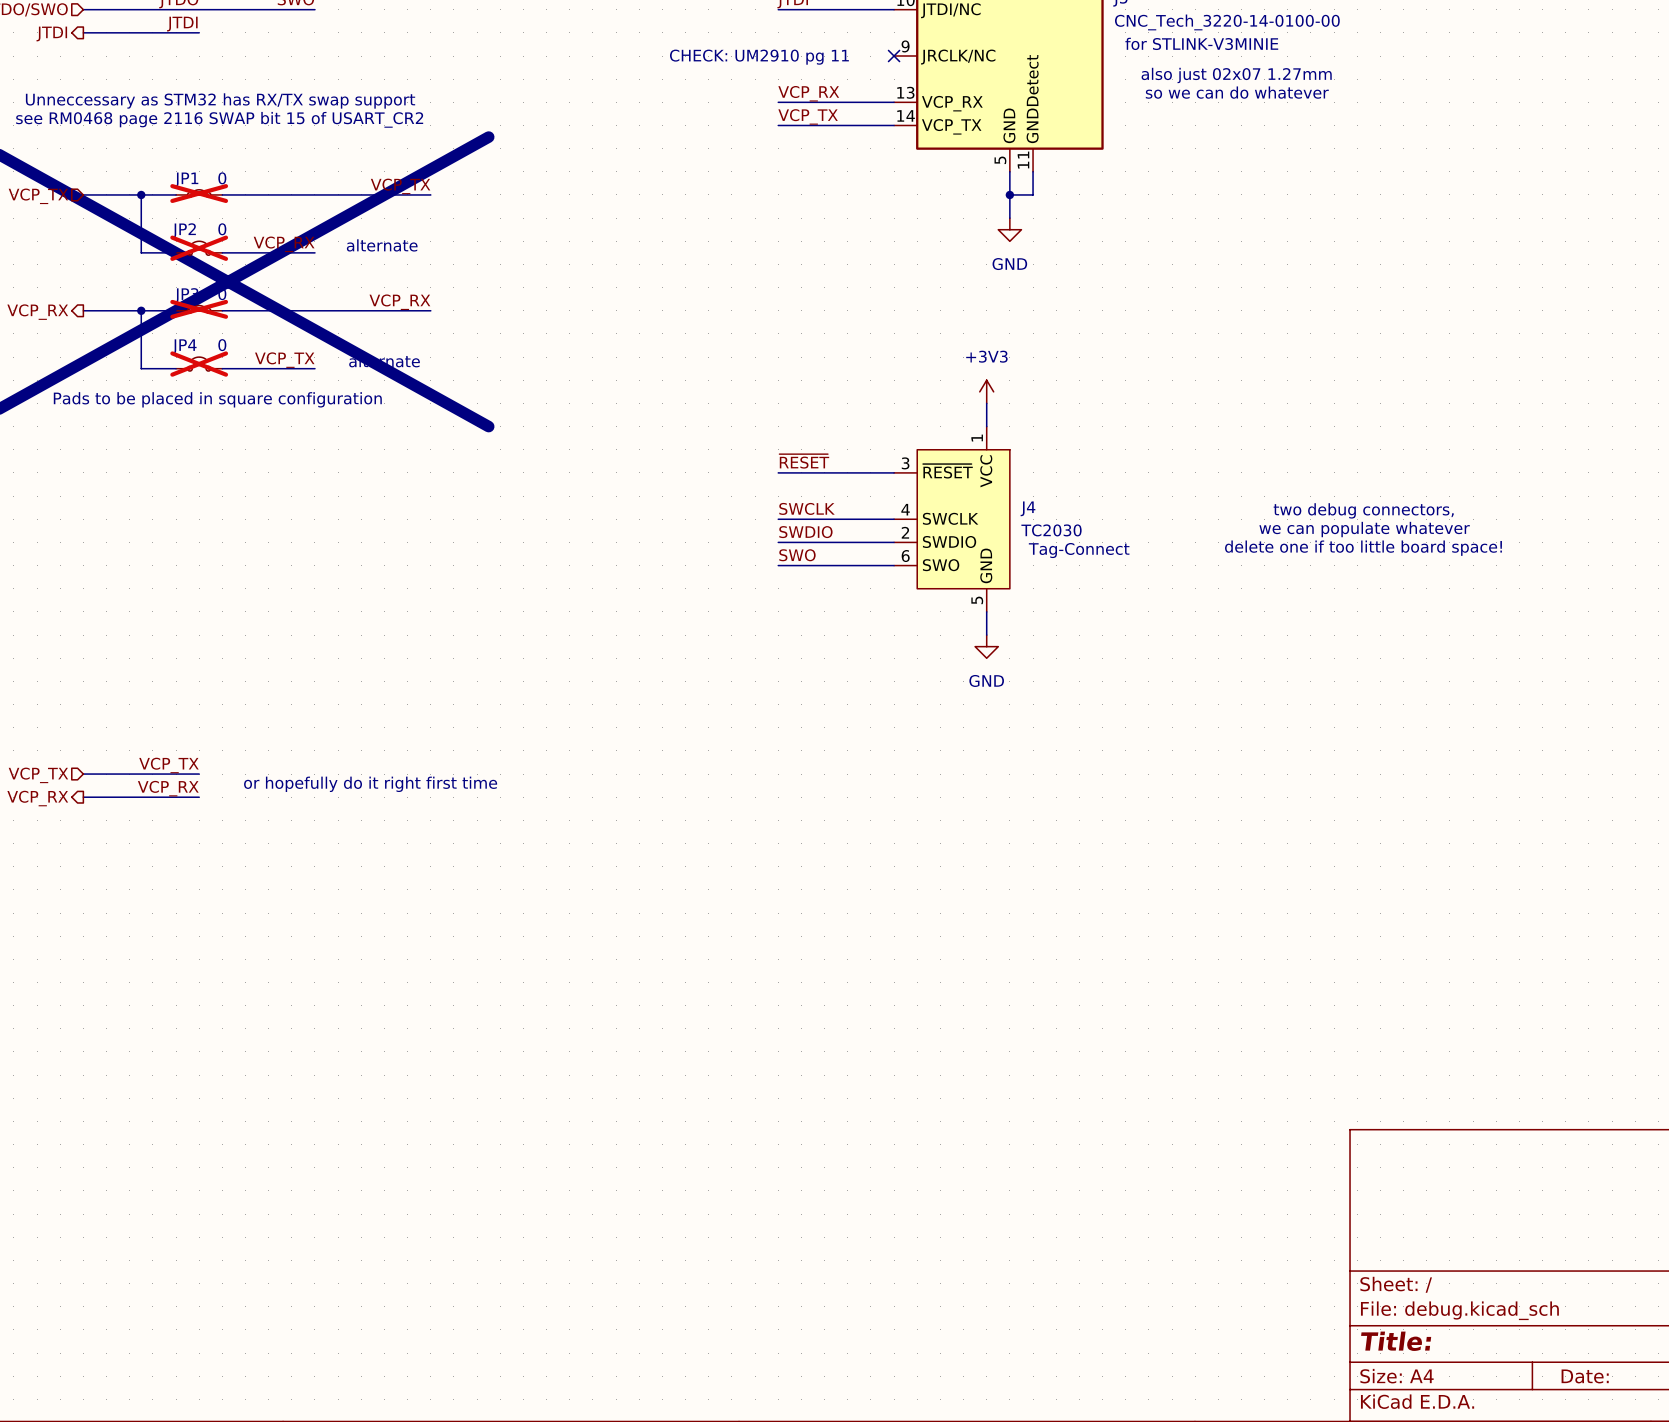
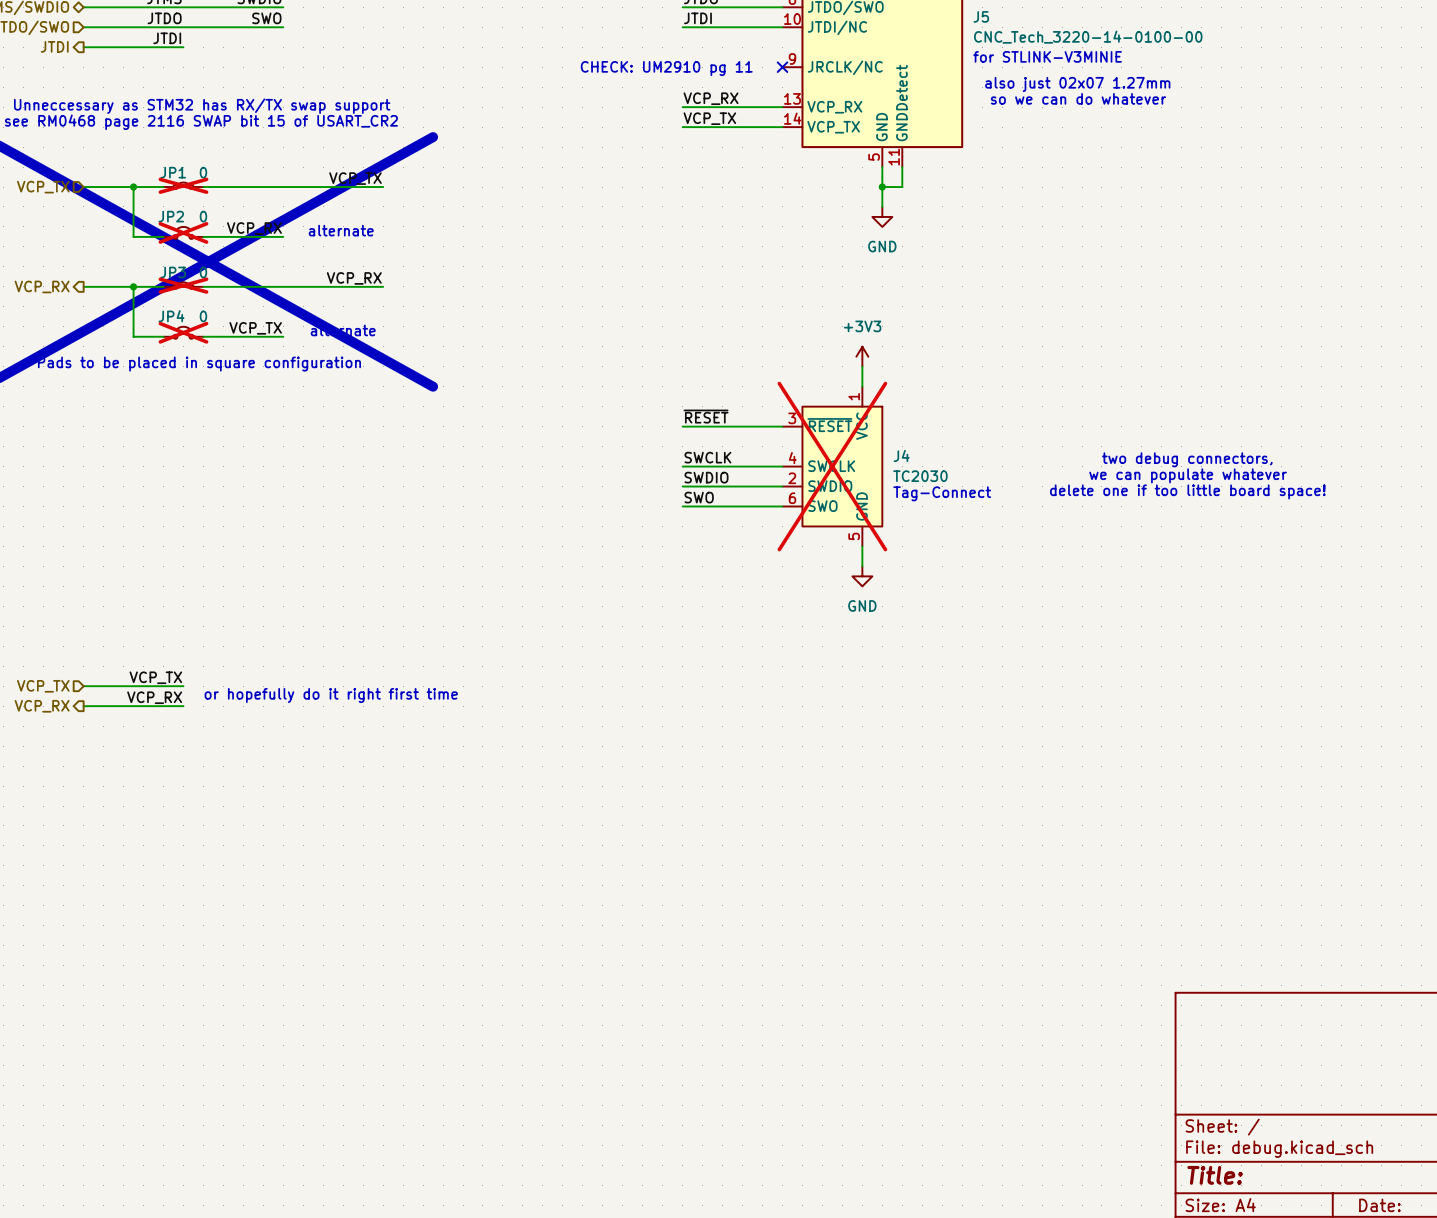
J4 do-not-place cross: none -> (832, 466)

